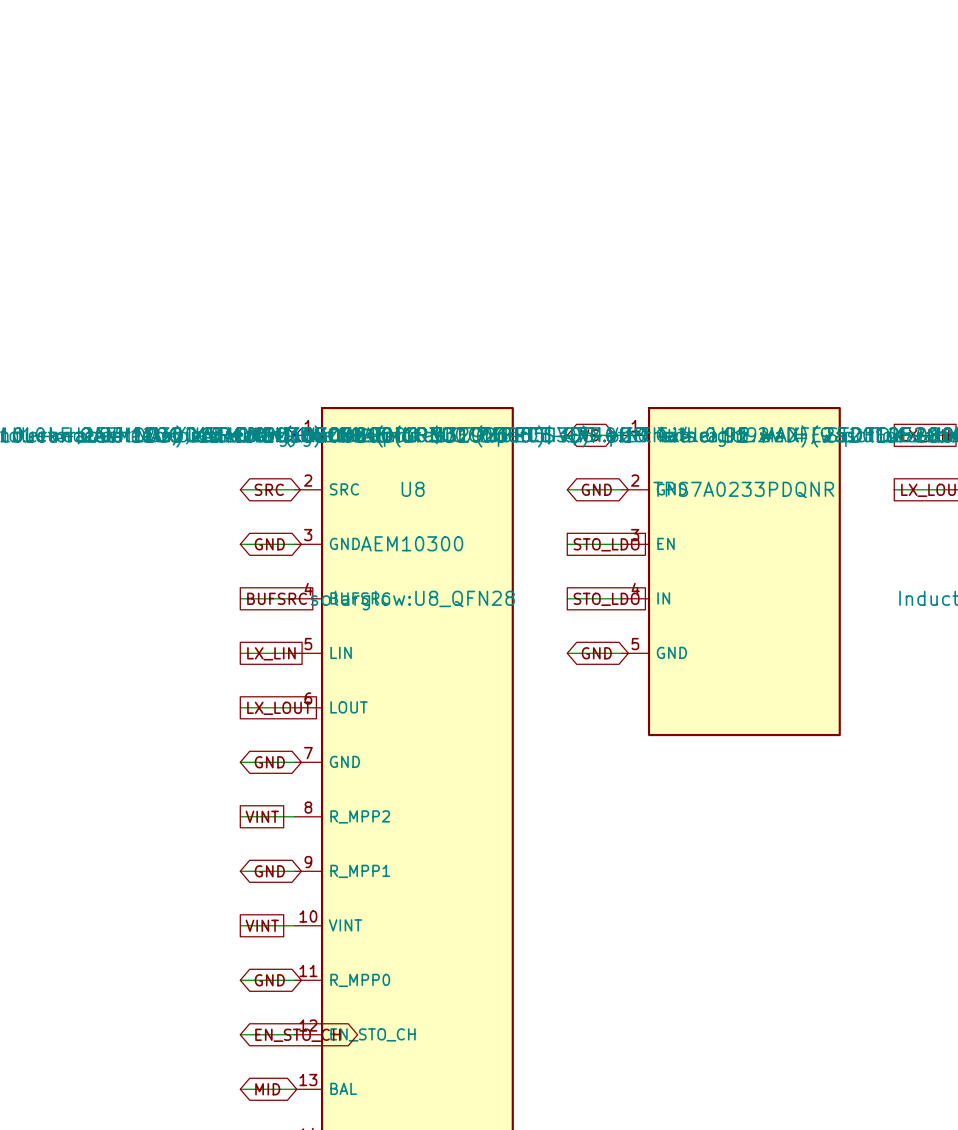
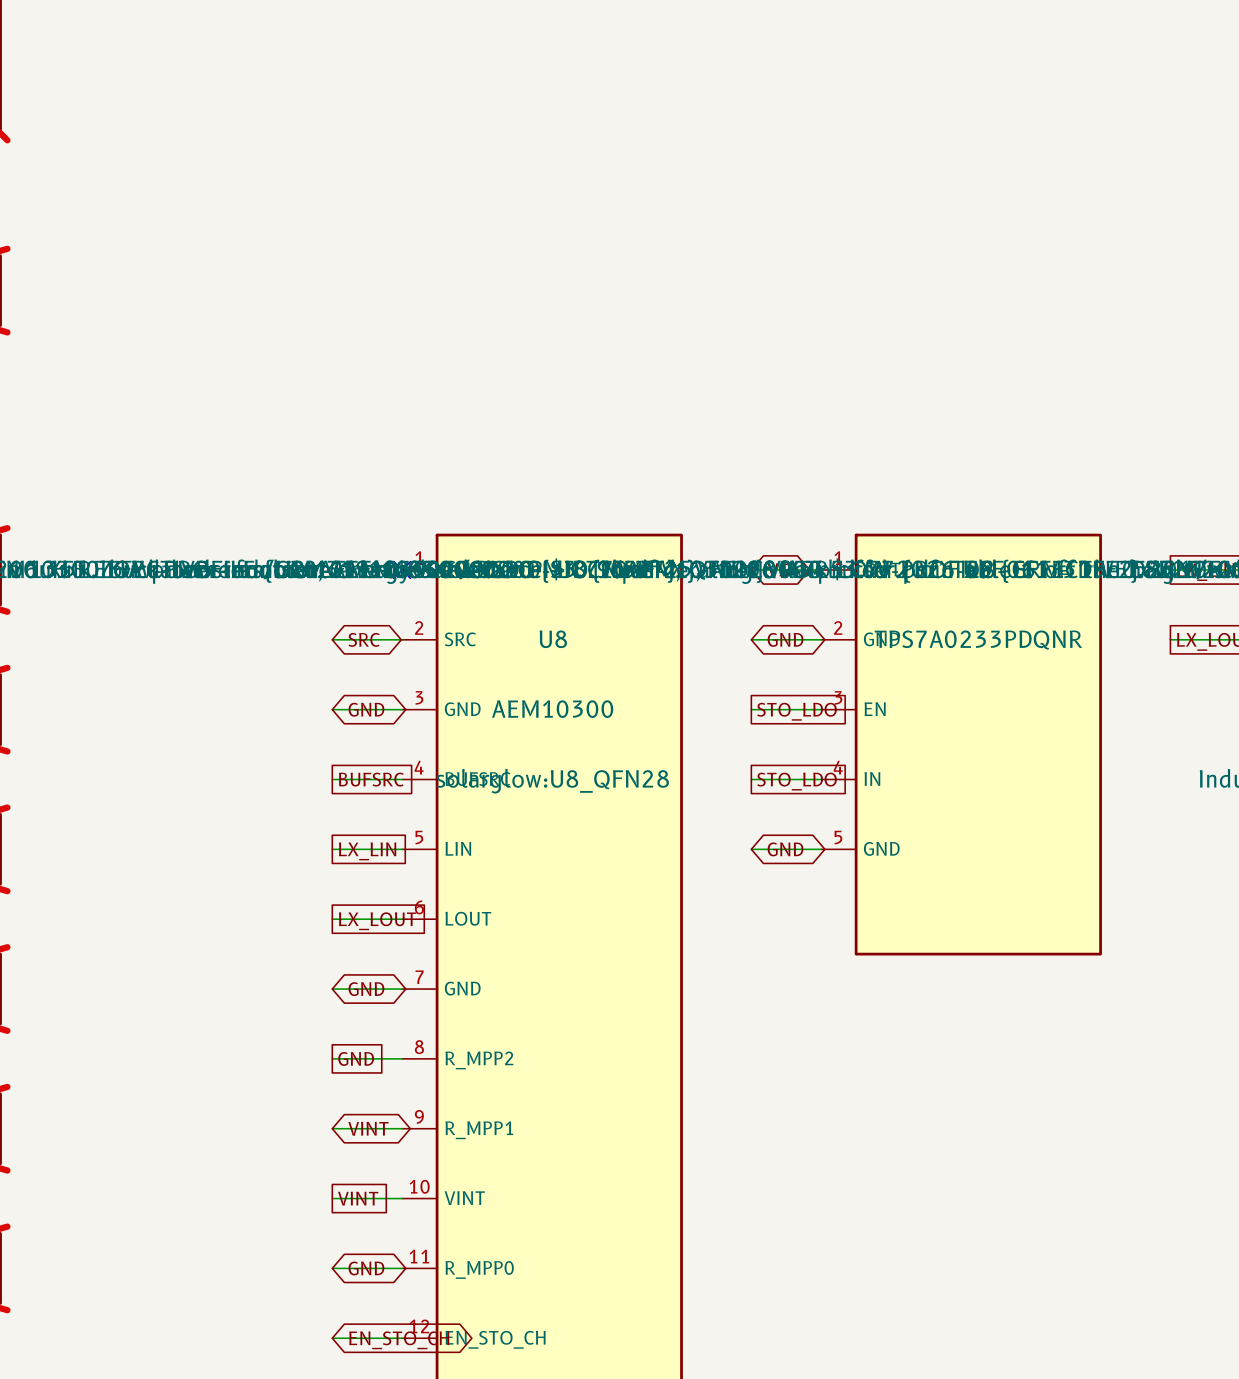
global label: VINT (262, 816) -> GND (356, 1058)
global label: GND (269, 871) -> VINT (368, 1128)

